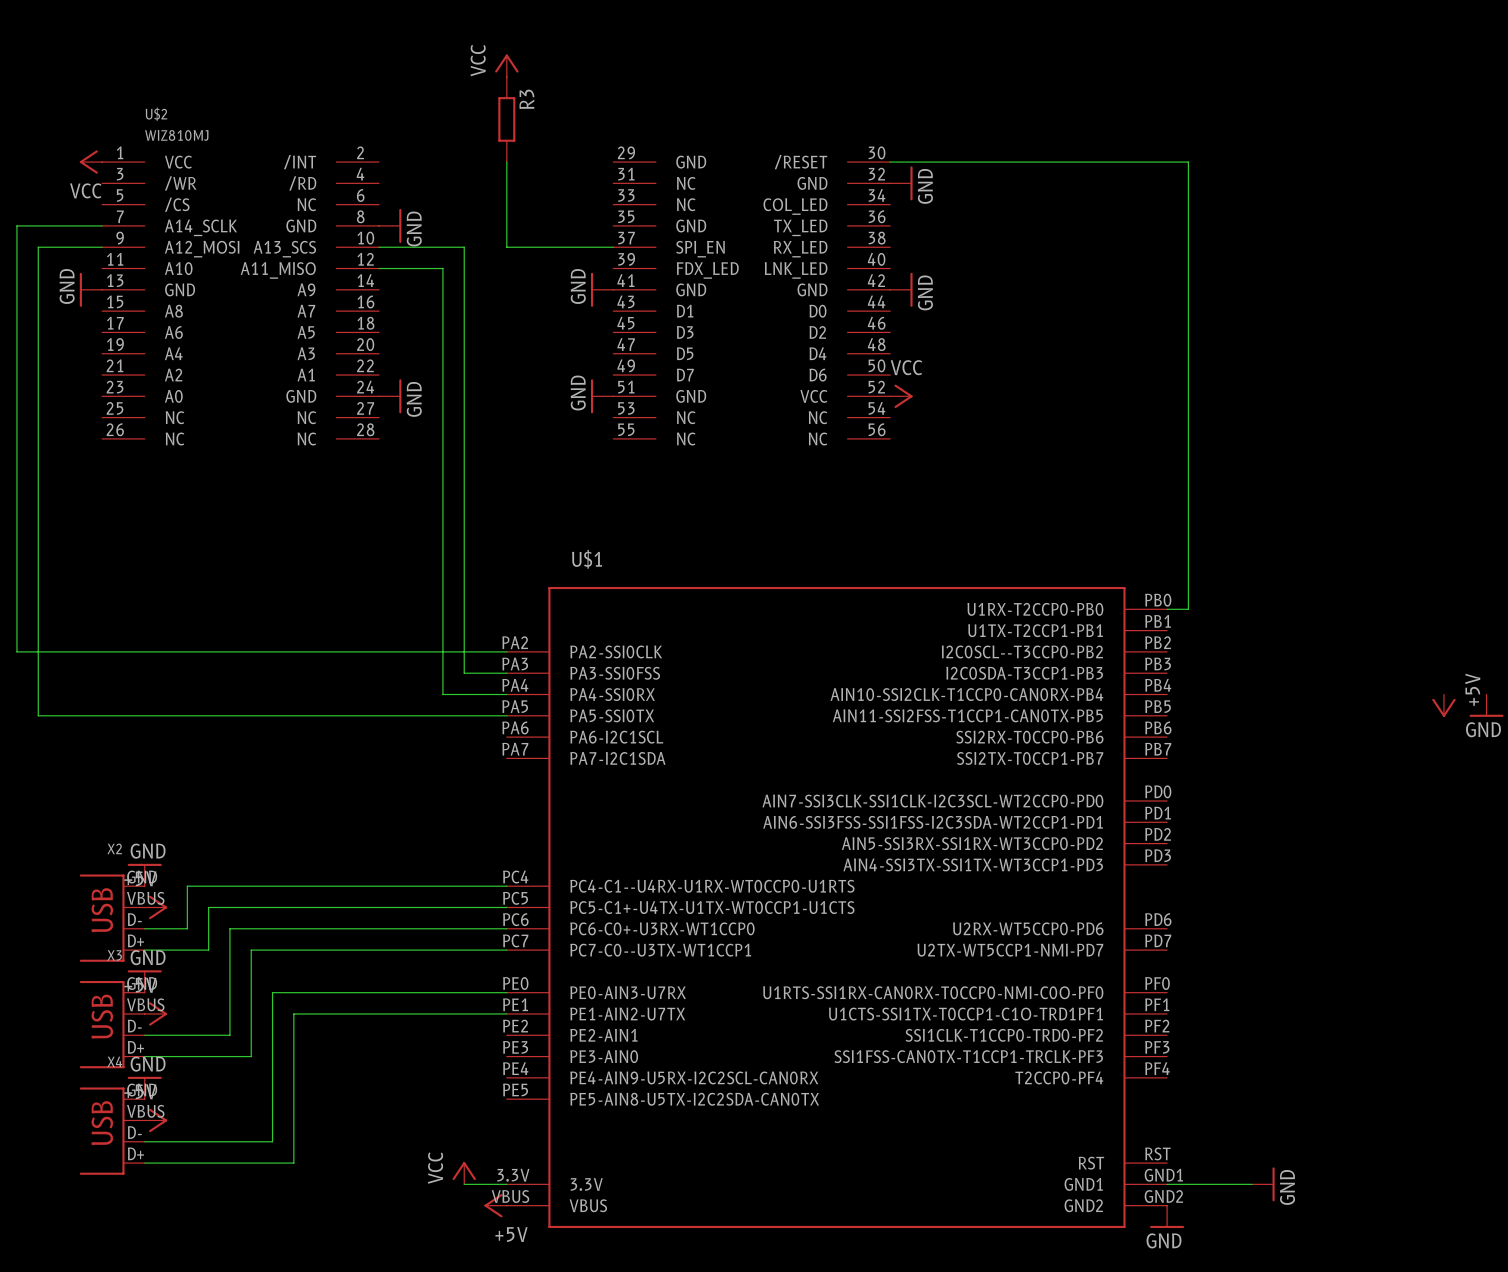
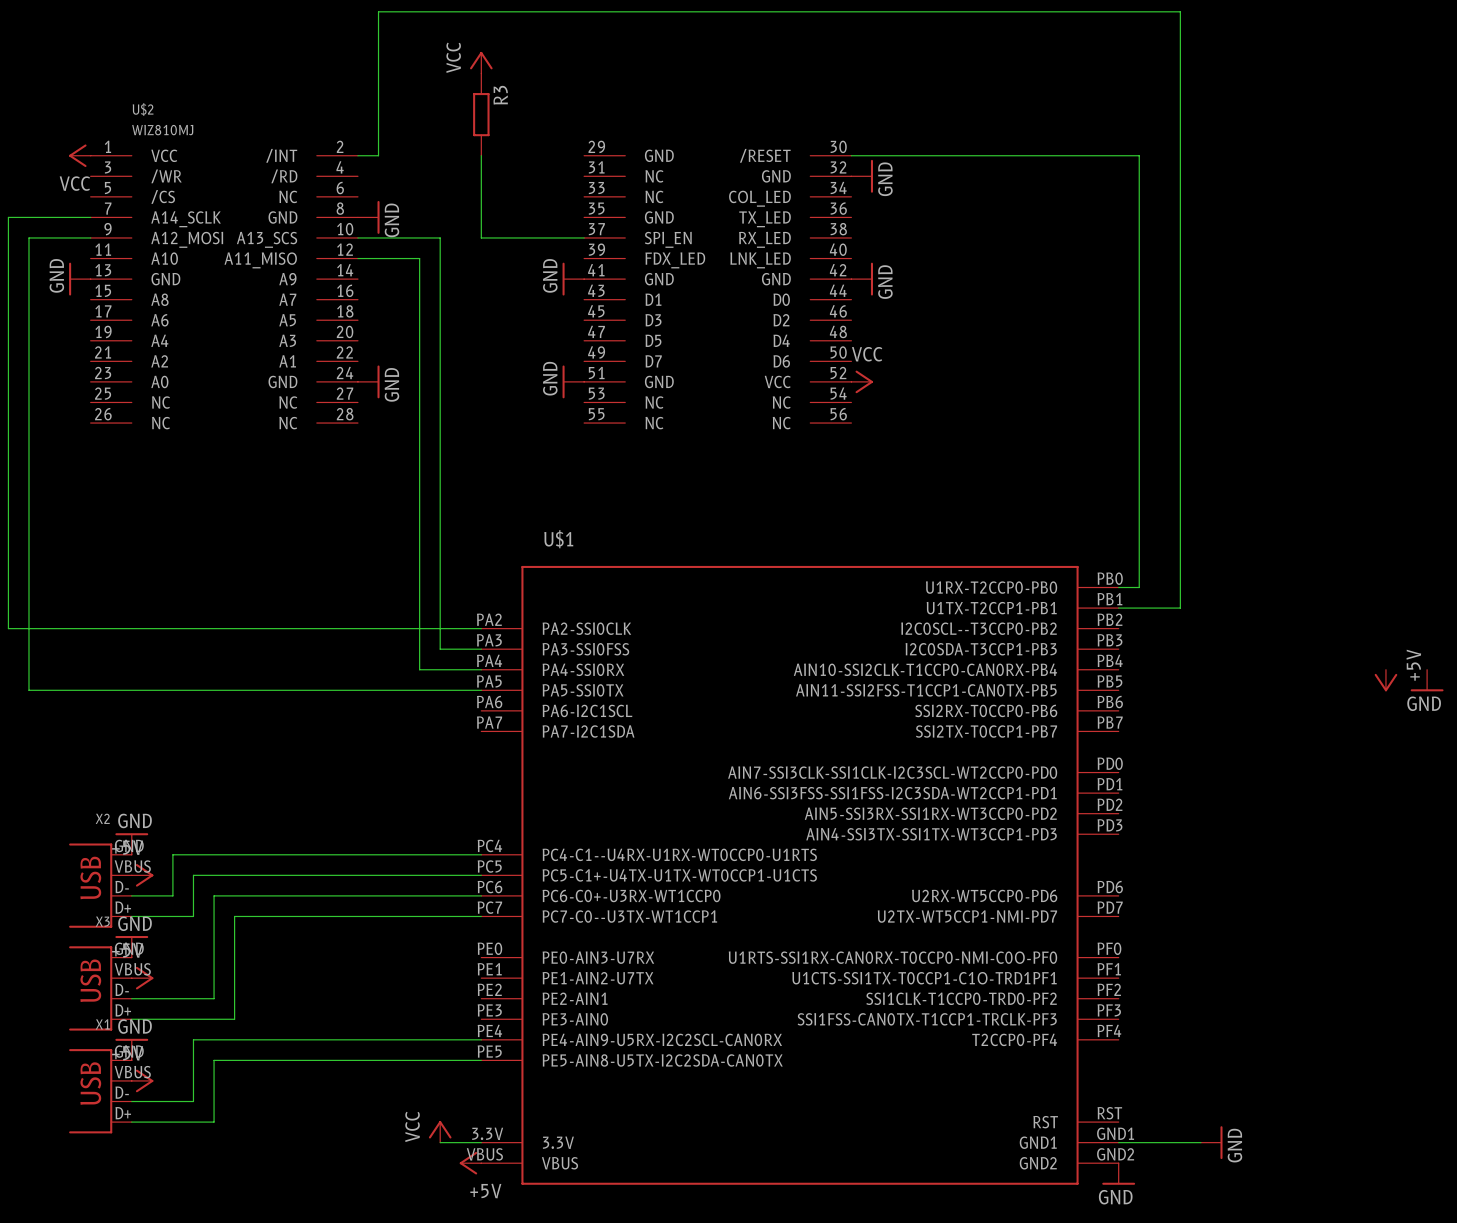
wire: none -> (357, 155) (378, 155) (378, 11) (1180, 11) (1180, 608) (1118, 608)
wire: (506, 992) (272, 992) (272, 1141) (208, 1141) -> (481, 1039) (193, 1039) (193, 1101)
wire: (506, 1013) (293, 1013) (293, 1163) (229, 1163) -> (481, 1060) (214, 1060) (214, 1122)
X4 name: X4 (114, 1061) -> X1 (102, 1024)

